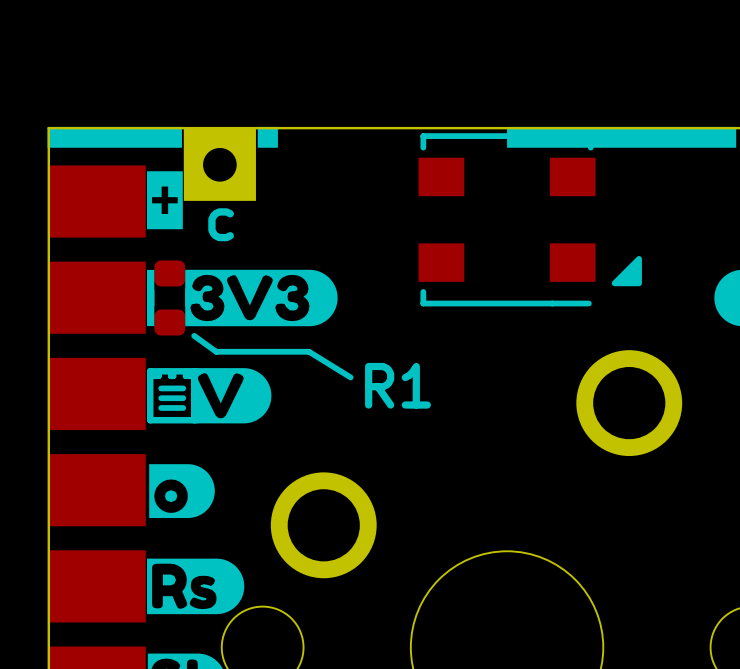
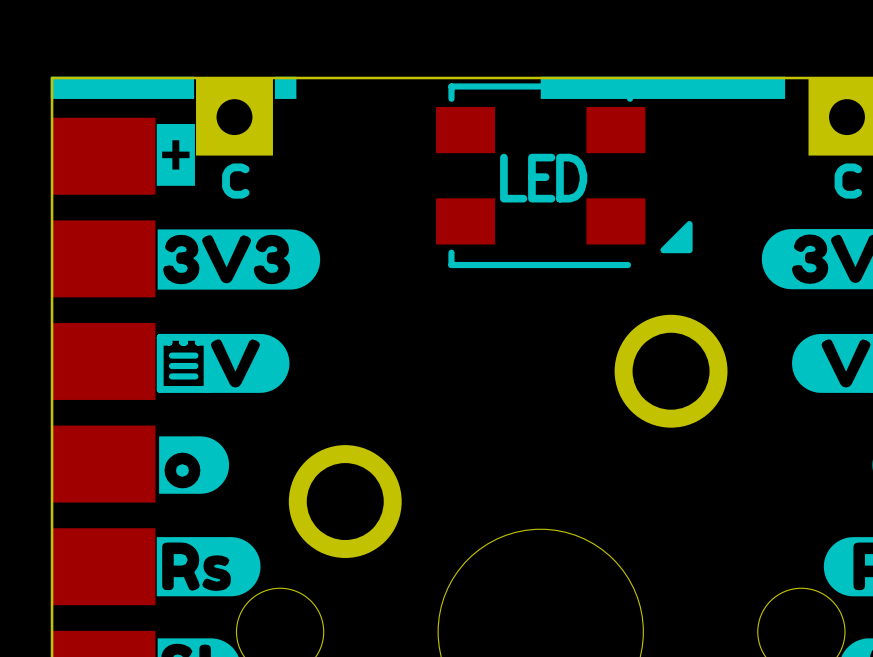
part footprint: [418, 133, 596, 307] -> [436, 83, 693, 269]
text: none -> L (513, 178)
text: none -> E (541, 178)
text: none -> D (571, 178)
drawing: [611, 256, 642, 287] -> none
drawing: [146, 269, 155, 327] -> none
R1: (169, 298) -> none
drawing position: (261, 298) -> (238, 259)
line: (194, 335) (216, 351) (309, 351) (350, 377) -> none

